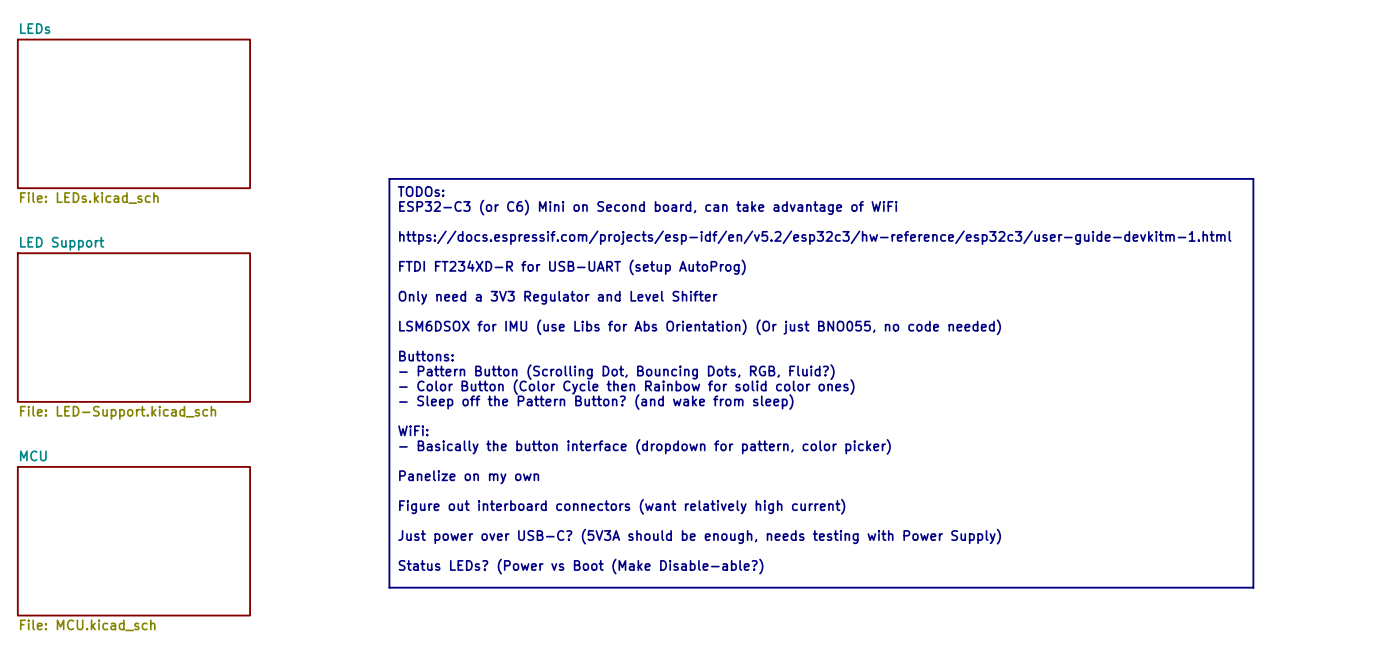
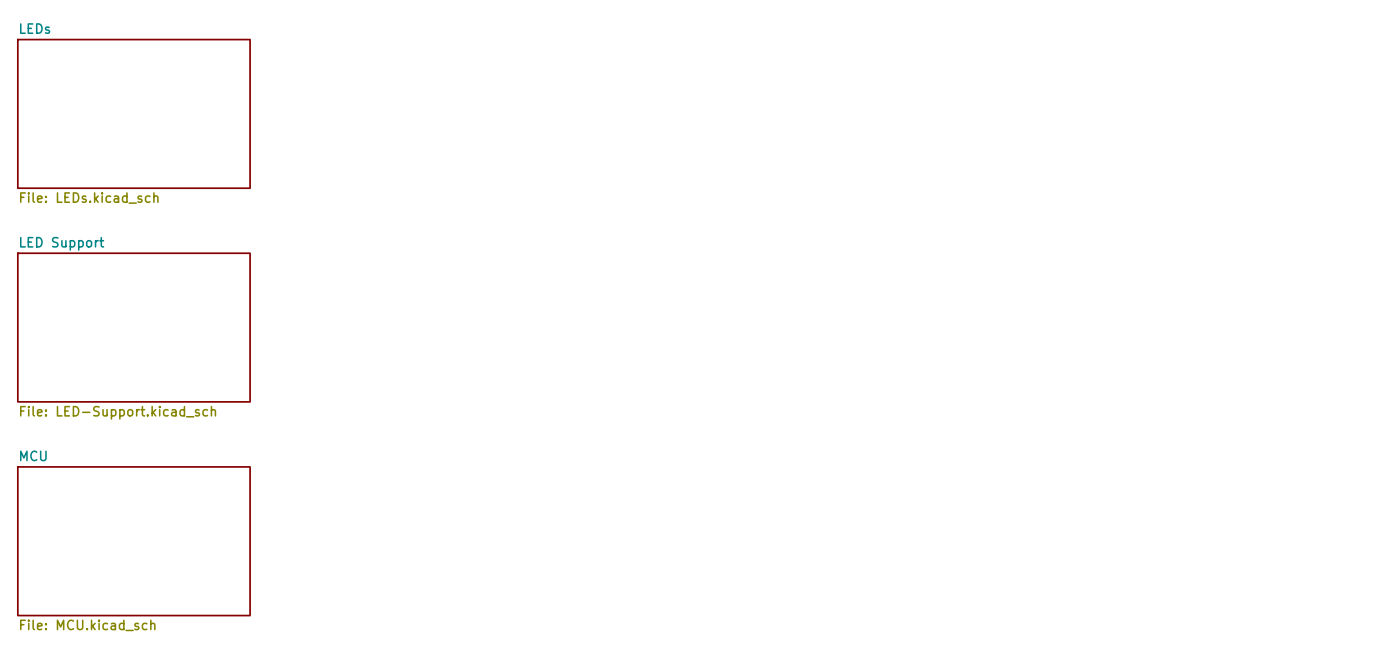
line: (389, 178) (1253, 178) (1253, 587) (389, 587) (389, 178) -> none
text: TODOs: (421, 191) -> none
text: ESP32-C3 (or C6) Mini on Second board, can take advantage of WiFi (648, 207) -> none
text: https://docs.espressif.com/projects/esp-idf/en/v5.2/esp32c3/hw-reference/esp32c3/user-guide-devkitm-1.html (815, 237) -> none
text: FTDI FT234XD-R for USB-UART (setup AutoProg) (572, 267) -> none
text: Only need a 3V3 Regulator and Level Shifter (558, 297) -> none
text: LSM6DSOX for IMU (use Libs for Abs Orientation) (Or just BNO055, no code needed) (700, 327) -> none
text: Buttons: (426, 356) -> none
text: - Pattern Button (Scrolling Dot, Bouncing Dots, RGB, Fluid?) (616, 372) -> none
text: - Color Button (Color Cycle then Rainbow for solid color ones) (626, 387) -> none
text: - Sleep off the Pattern Button? (and wake from sleep) (596, 402) -> none
text: WiFi: (413, 430) -> none
text: - Basically the button interface (dropdown for pattern, color picker) (644, 446) -> none
text: Panelize on my own (469, 477) -> none
text: Figure out interboard connectors (want relatively high current) (622, 506) -> none
text: Just power over USB-C? (5V3A should be enough, needs testing with Power Supply) (699, 536) -> none
text: Status LEDs? (Power vs Boot (Make Disable-able?) (581, 566) -> none

